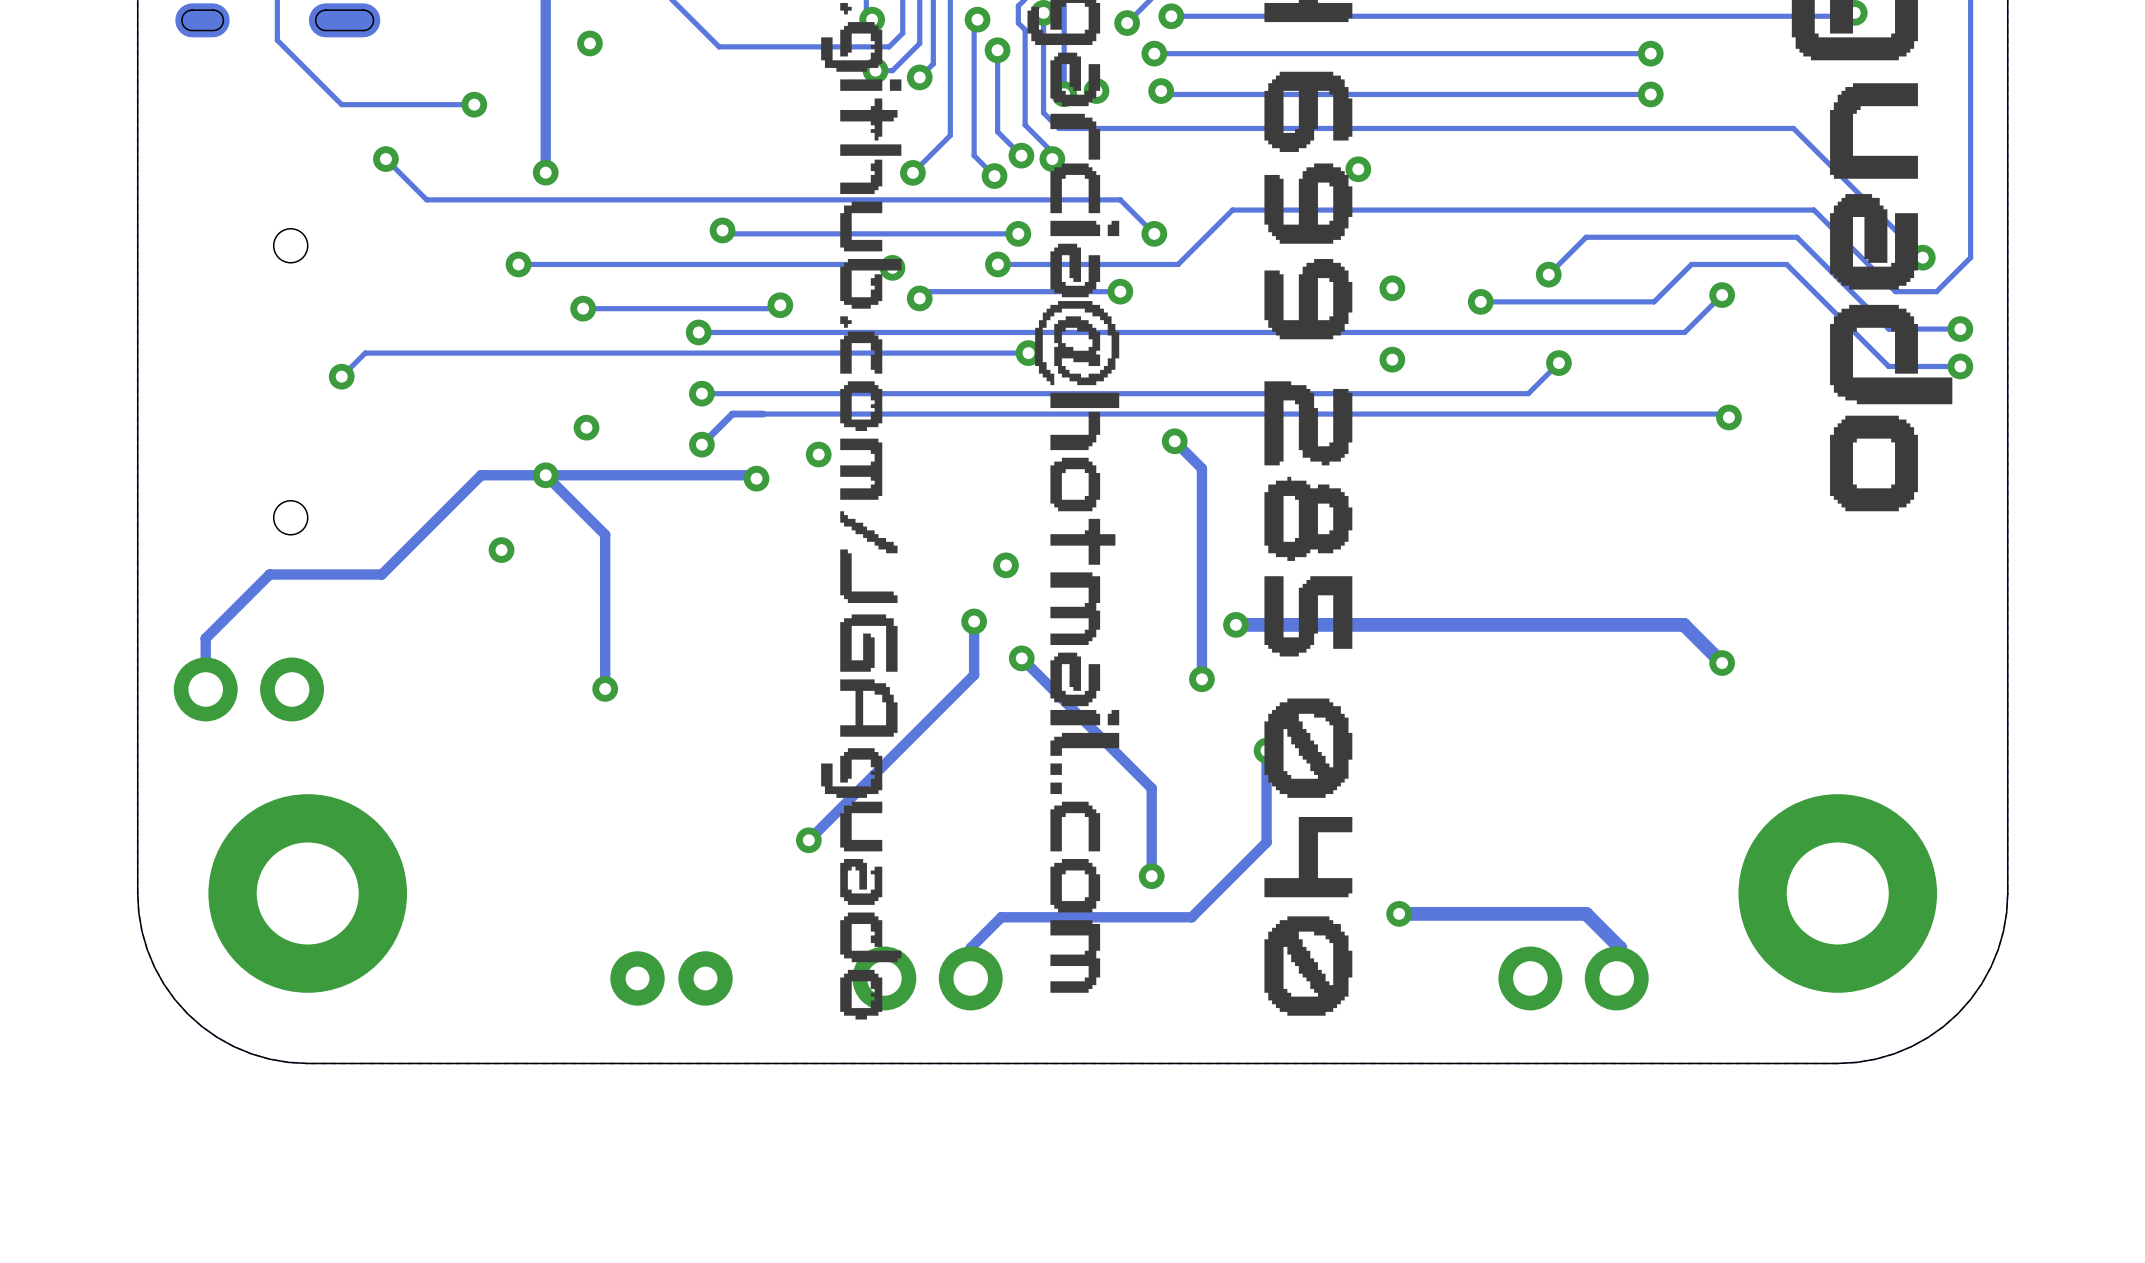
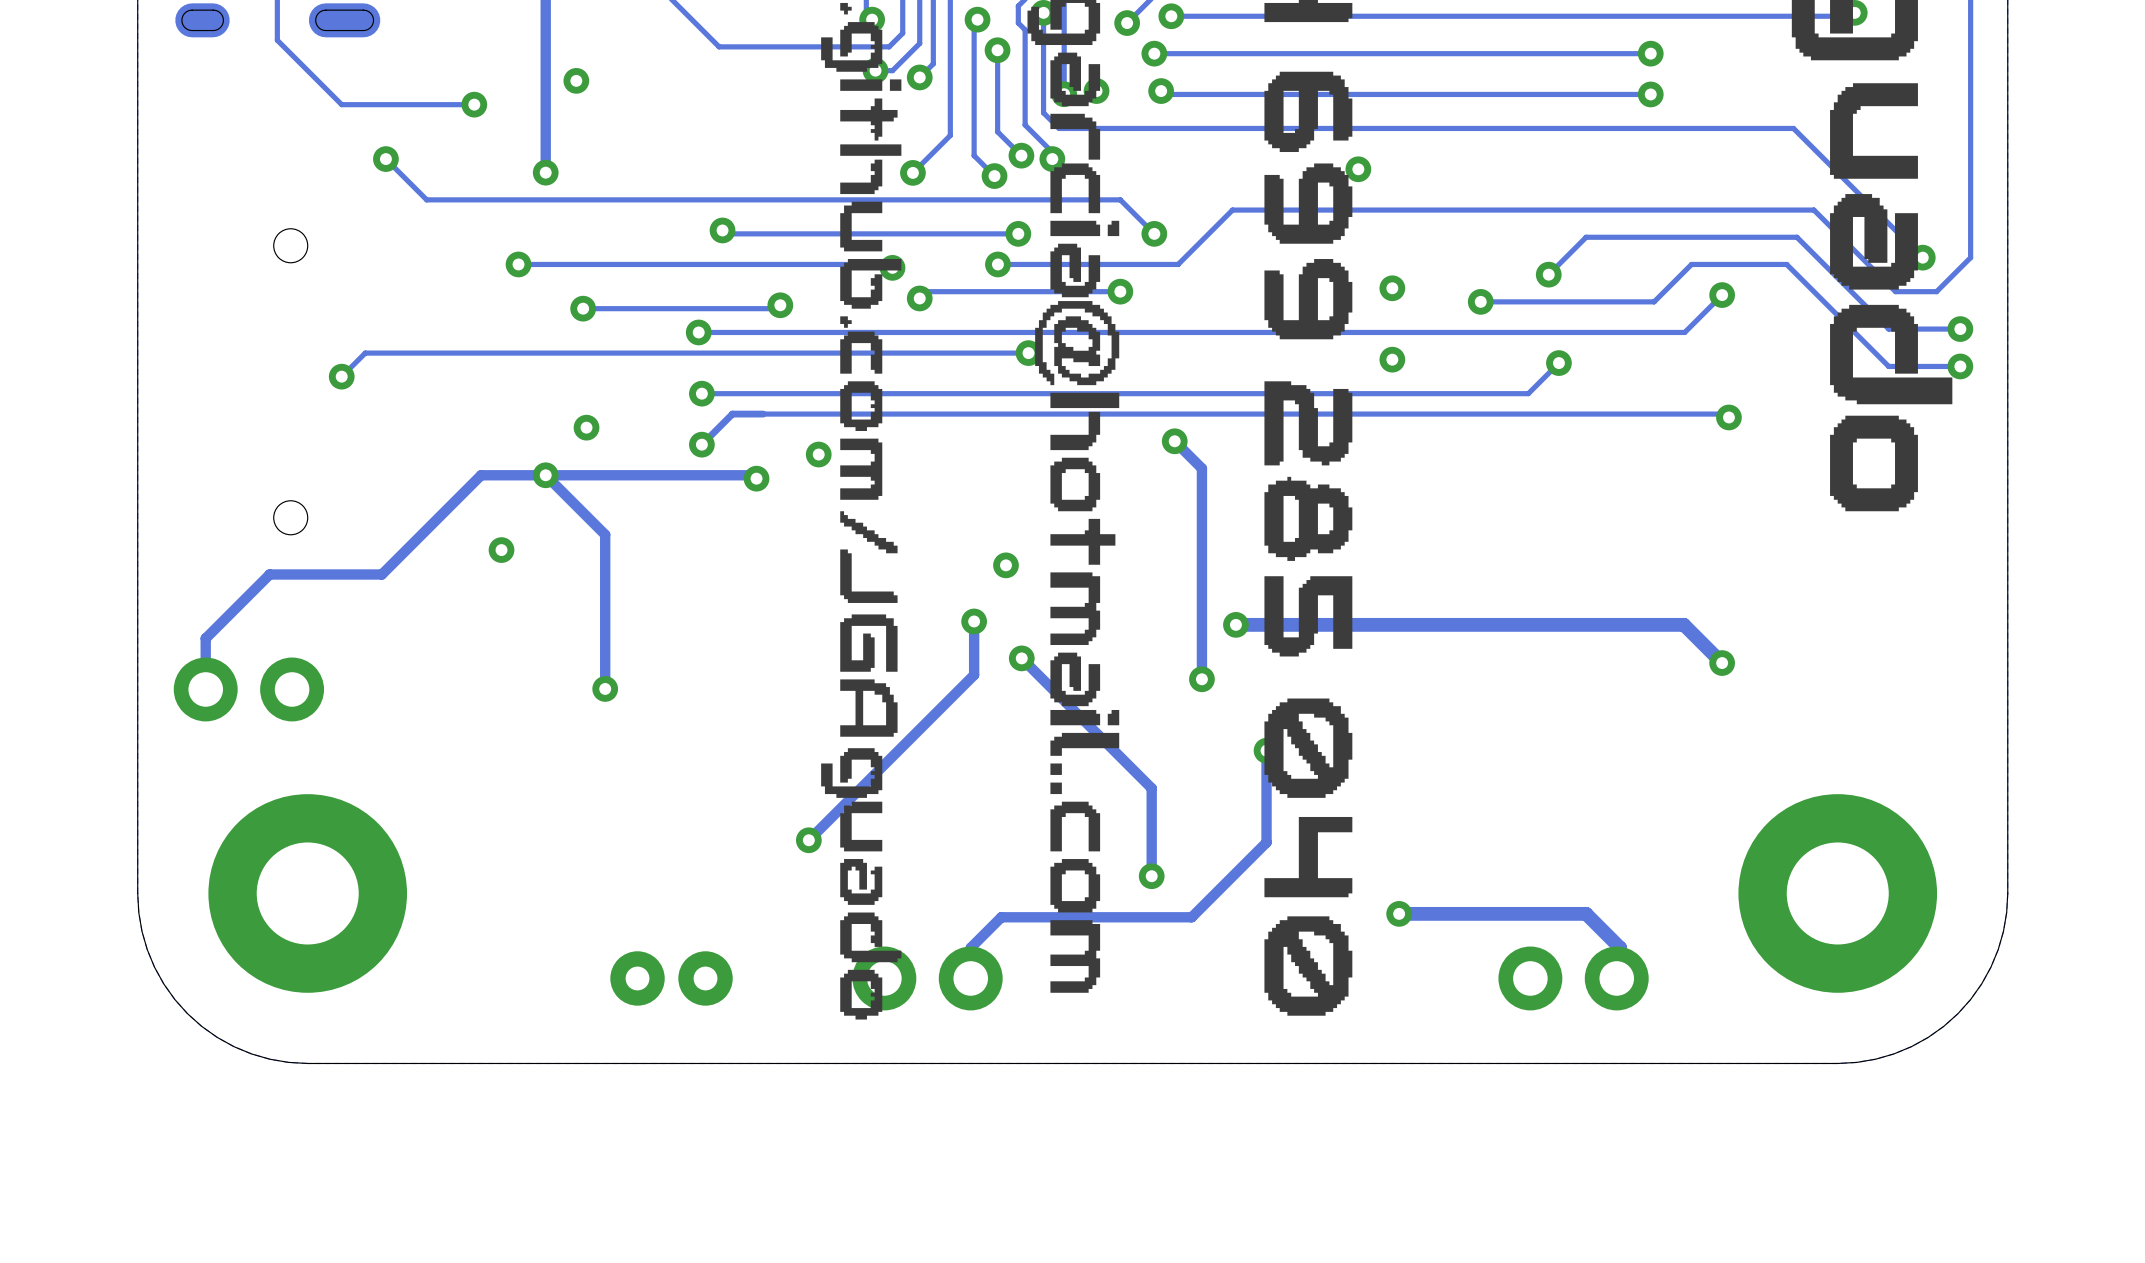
via position: (589, 43) -> (576, 80)

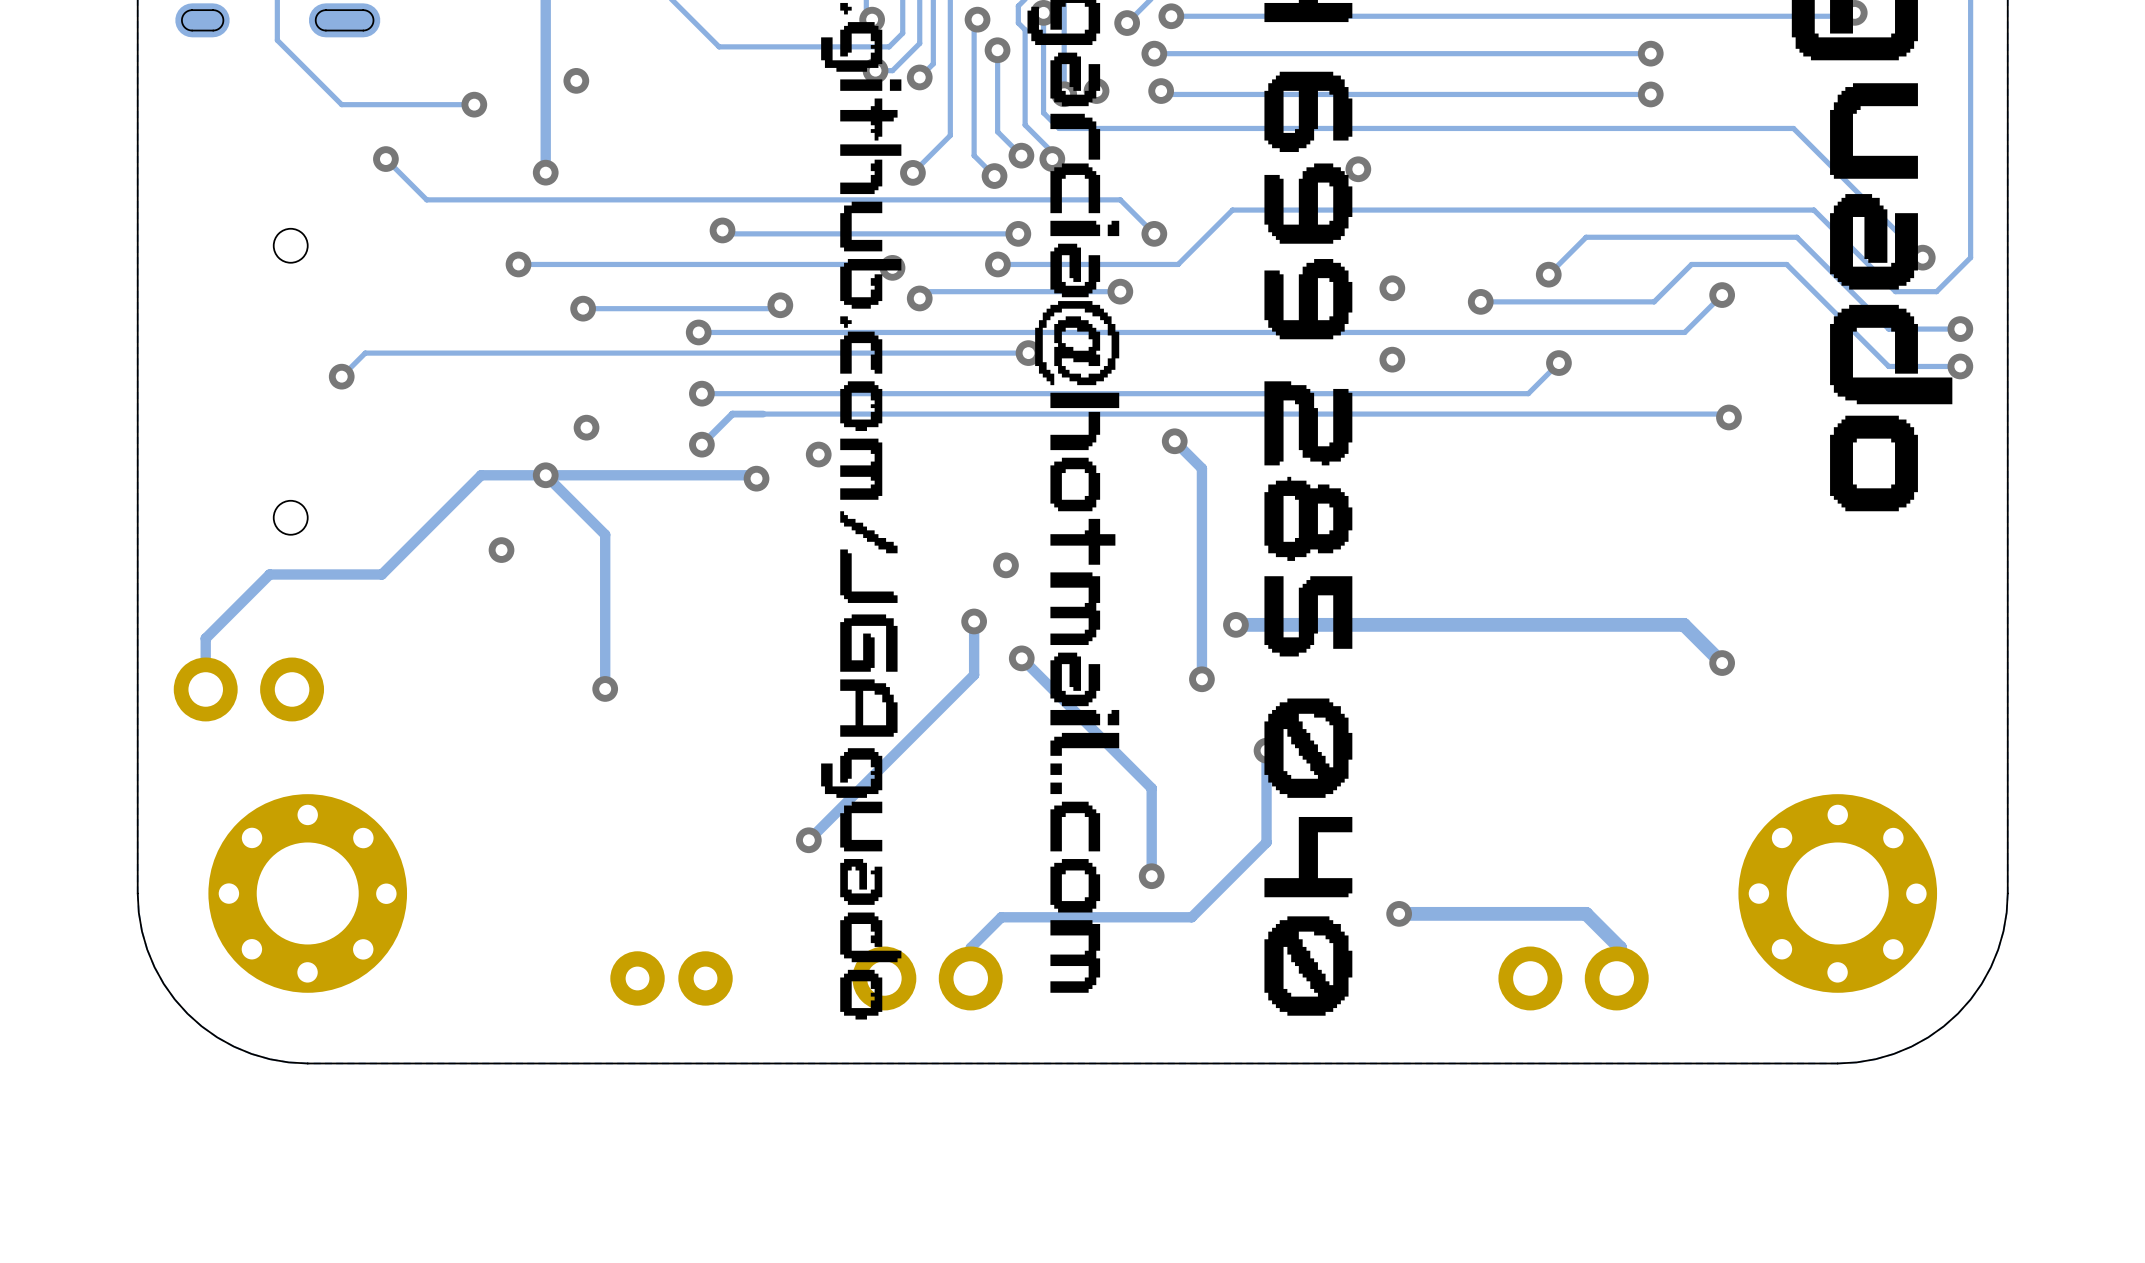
part footprint: [208, 794, 408, 993] -> [208, 794, 408, 993]
part footprint: [1738, 794, 1938, 993] -> [1738, 794, 1938, 993]

